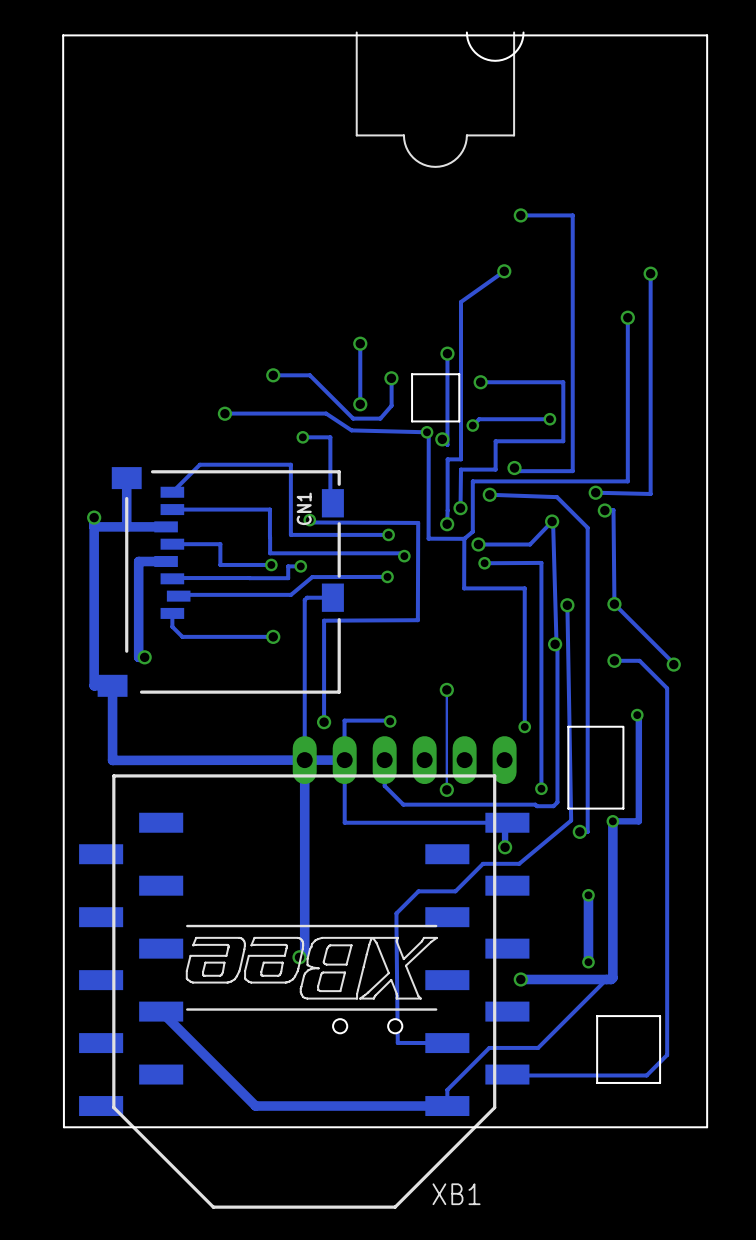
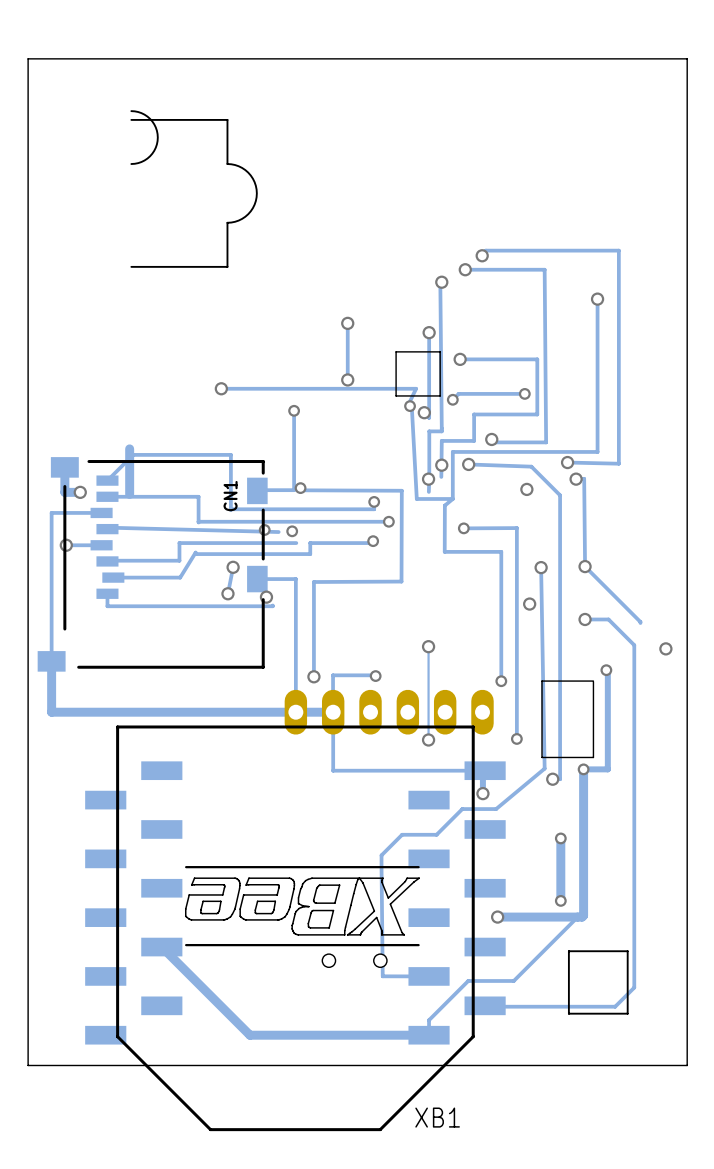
board edge: (707, 35) (63, 35) (63, 1127) (707, 1127) (707, 35) -> (687, 58) (687, 1065) (28, 1065) (28, 58) (687, 58)
part rotation: 0° (440, 99) -> 90° counterclockwise (194, 189)
part position: (440, 99) -> (194, 189)
track: (520, 215) (572, 215) (572, 471) -> (465, 269) (544, 269) (546, 442)
via: (520, 215) -> none
track: none -> (485, 251) (618, 250) (618, 257)
track: (504, 271) (461, 301) (461, 456) -> (441, 282) (441, 428)
via: (650, 273) -> none
via: none -> (465, 269)
via: none -> (441, 282)
track: (273, 375) (309, 375) (353, 418) (380, 418) (391, 405) (391, 378) -> none
via: (273, 375) -> none
via: (391, 378) -> none
track: (224, 413) (326, 413) (351, 430) (427, 432) (428, 430) (428, 538) (464, 538) -> (221, 388) (416, 388) (408, 404) (411, 404) (416, 498) (452, 498)
track: (302, 437) (330, 437) (330, 502) (332, 503) -> (294, 410) (294, 490) (257, 490)
track: (172, 492) (199, 464) (290, 464) (290, 534) (388, 534) -> (230, 509) (374, 509) (374, 501)
via: none -> (441, 465)
track: none -> (64, 477) (64, 492) (80, 492)
via: (460, 508) -> none
track: (172, 509) (269, 509) (269, 537) -> (107, 496) (198, 496) (198, 522)
via: none -> (428, 479)
track: none -> (107, 480) (133, 454) (230, 454) (230, 510)
track: (94, 517) (94, 685) (112, 685) (112, 760) (304, 760) (304, 952) (299, 957) -> none
via position: (94, 517) -> (80, 492)
via: (447, 524) -> none
track: (166, 526) (94, 526) -> none
track: (270, 537) (270, 553) (404, 553) (404, 556) -> (198, 521) (388, 521)
track: (172, 542) (172, 544) (220, 544) (220, 564) (271, 564) -> none
track: (478, 544) (530, 544) (553, 521) (557, 644) (557, 802) (553, 806) (403, 804) (384, 785) (384, 760) -> none
via: (478, 544) -> none
track: none -> (101, 512) (51, 512) (51, 712) (295, 712)
track: (166, 561) (138, 561) (138, 657) (144, 657) -> none
track: none -> (107, 529) (278, 532)
track: (300, 566) (288, 566) (288, 578) (249, 578) -> none
track: (387, 576) (312, 577) (291, 594) (178, 596) -> none
track: (249, 578) (172, 578) -> none
track: none -> (296, 543) (179, 543) (179, 560) (107, 561)
track: none -> (373, 543) (310, 543) (310, 554) (195, 552) (180, 577) (113, 577)
via: none -> (66, 545)
track: none -> (101, 545) (66, 545)
CN1 position: (220, 581) -> (152, 564)
track: (332, 597) (307, 597) (304, 600) (304, 617) -> (257, 579) (295, 579)
track: none -> (233, 567) (227, 593)
via: none -> (233, 567)
track: (172, 613) (172, 626) (182, 636) (273, 636) -> none
track: none -> (107, 593) (107, 606) (272, 605)
via: none -> (227, 593)
via: (144, 657) -> none
via position: (673, 664) -> (665, 648)
via: (299, 957) -> none

